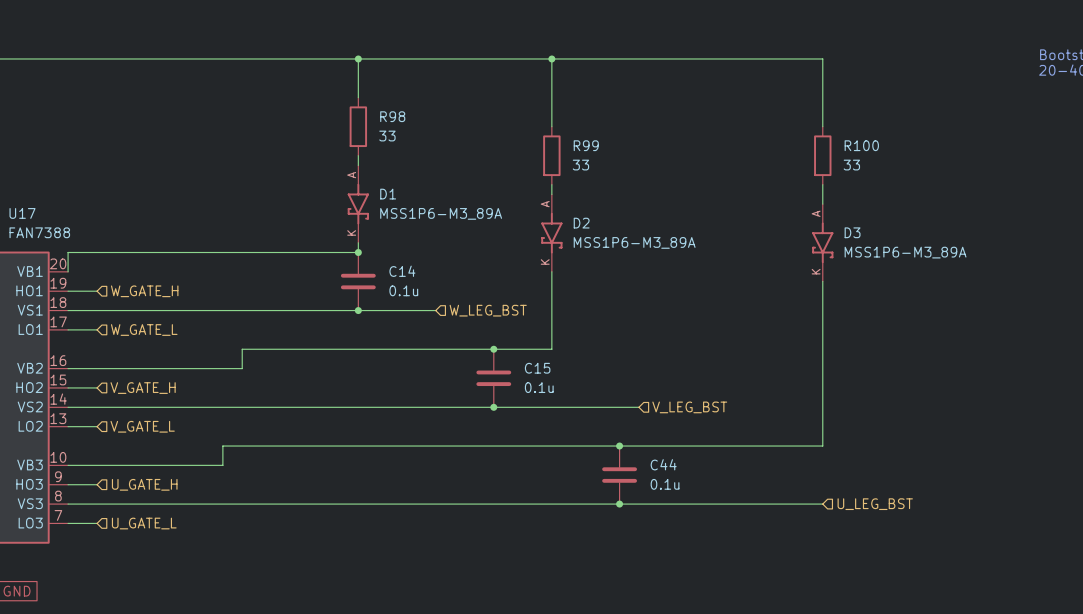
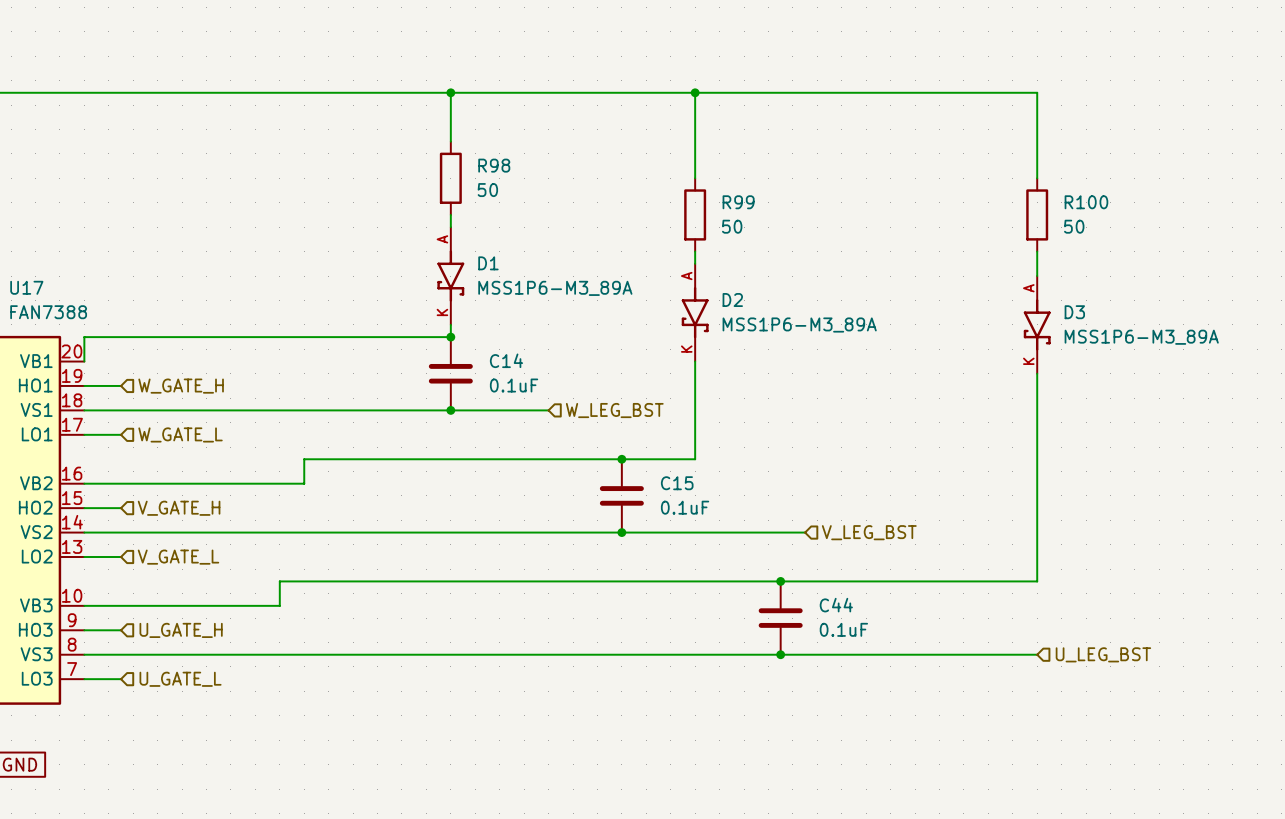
R98 value: 33 (387, 136) -> 50 (487, 190)
R99 value: 33 (580, 165) -> 50 (732, 226)
R100 value: 33 (851, 165) -> 50 (1074, 226)
C14 value: 0.1u (403, 290) -> 0.1uF (514, 385)
C15 value: 0.1u (539, 387) -> 0.1uF (685, 507)
C44 value: 0.1u (665, 484) -> 0.1uF (843, 629)

